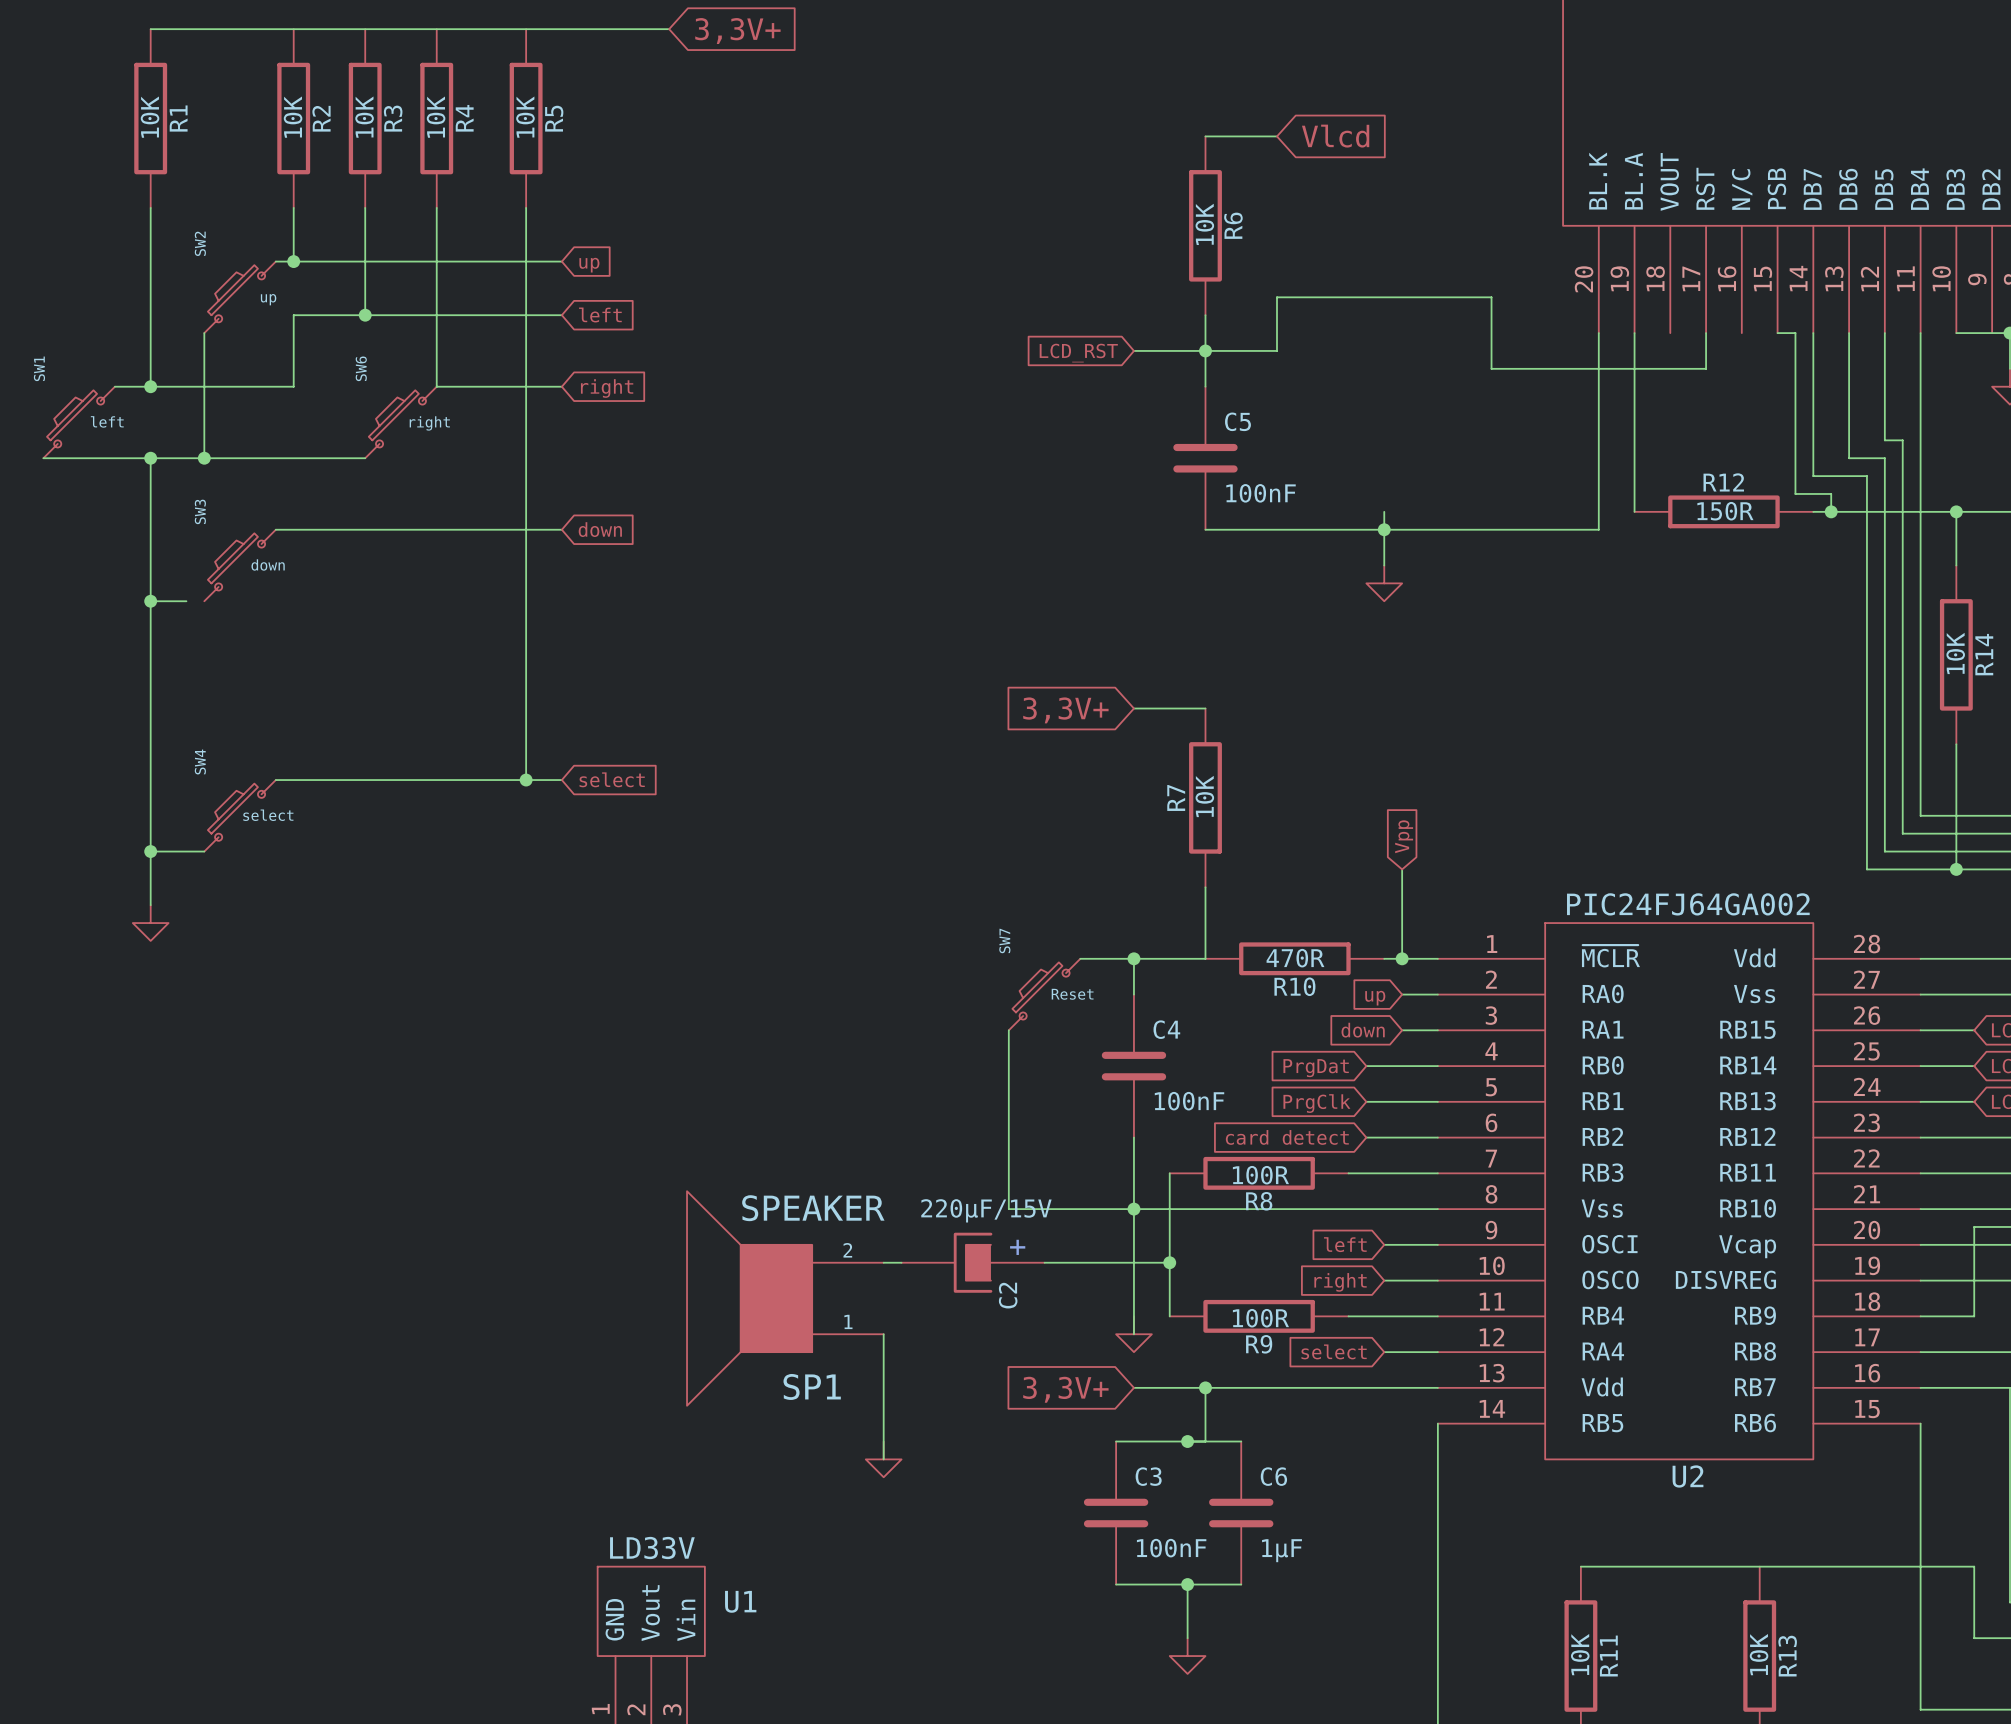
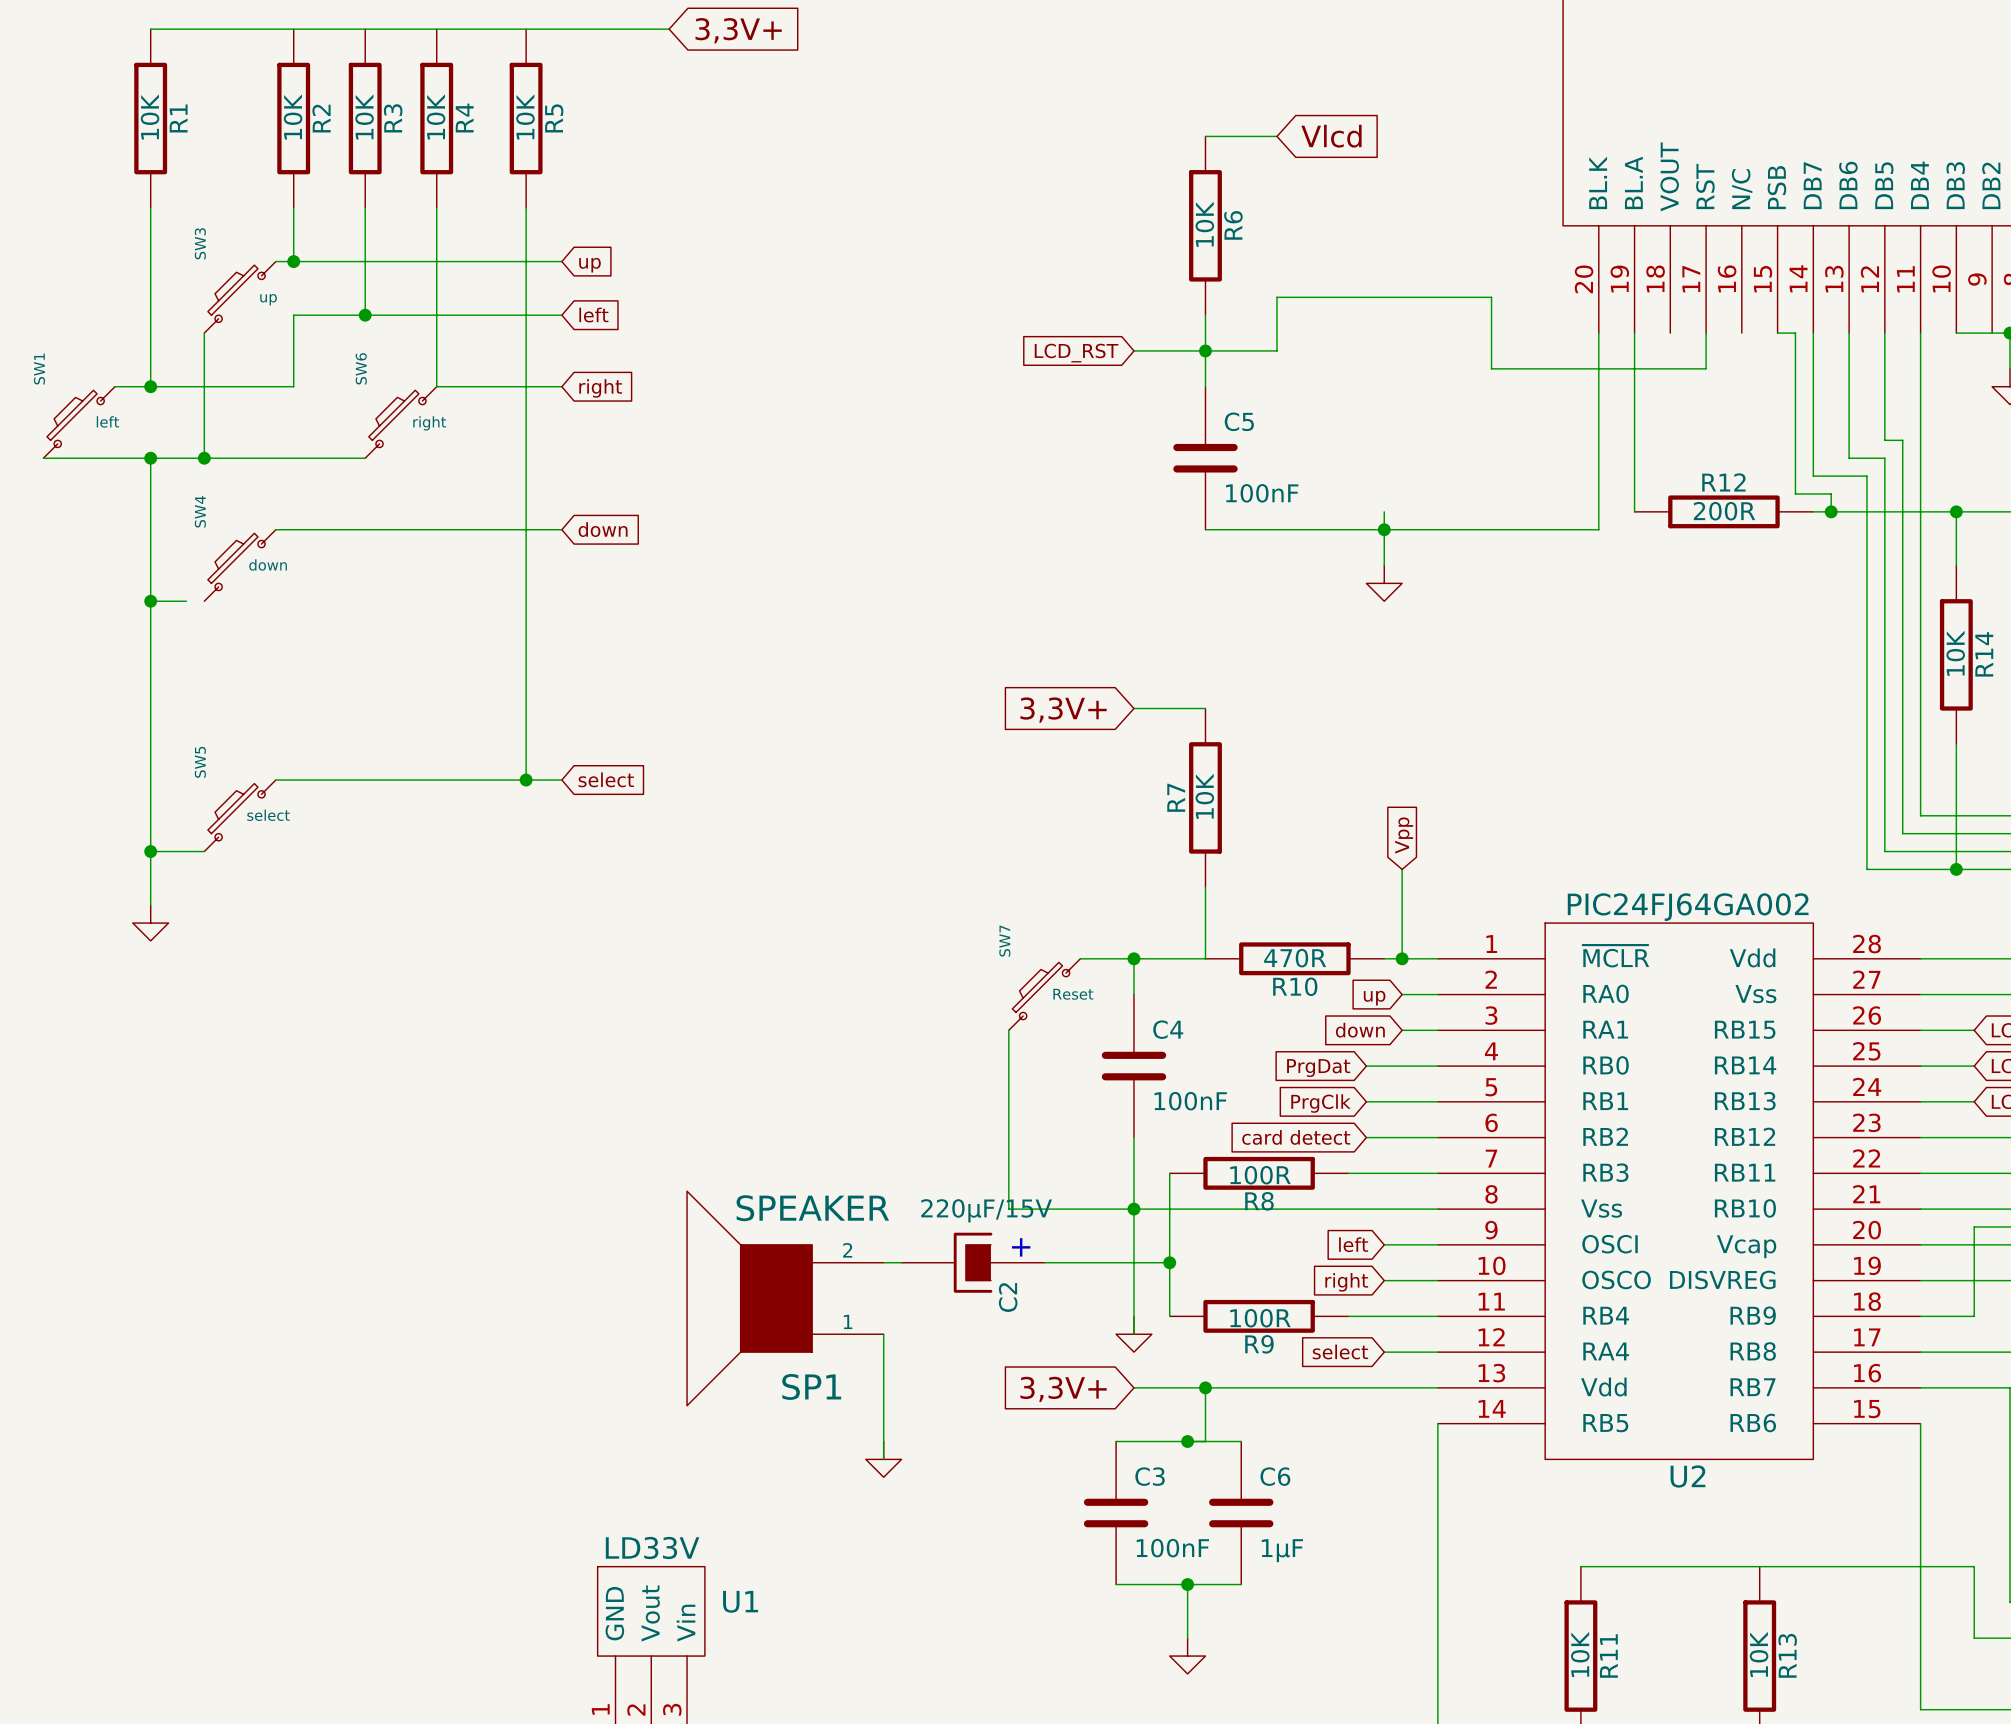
SW2 name: SW2 (200, 243) -> SW3 (200, 243)
SW3 name: SW3 (200, 511) -> SW4 (200, 511)
R12 value: 150R (1725, 511) -> 200R (1724, 511)
SW4 name: SW4 (200, 762) -> SW5 (200, 762)

